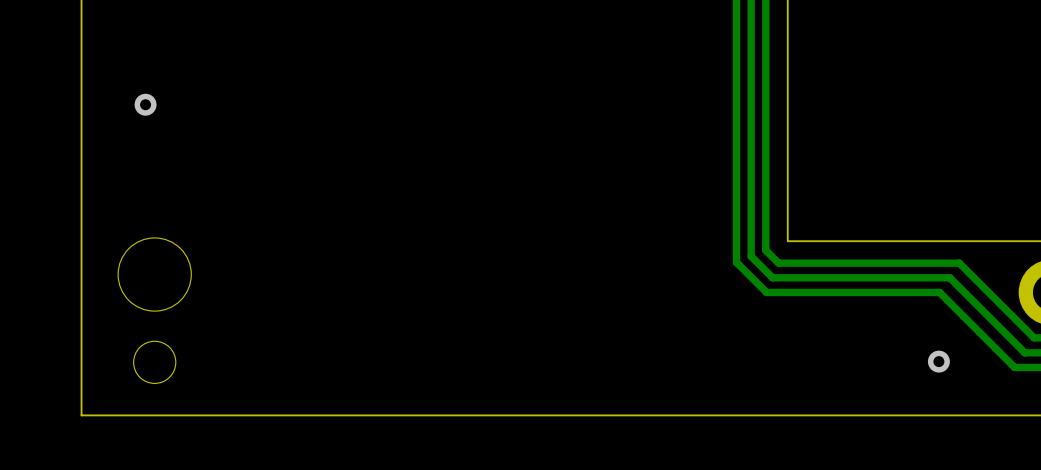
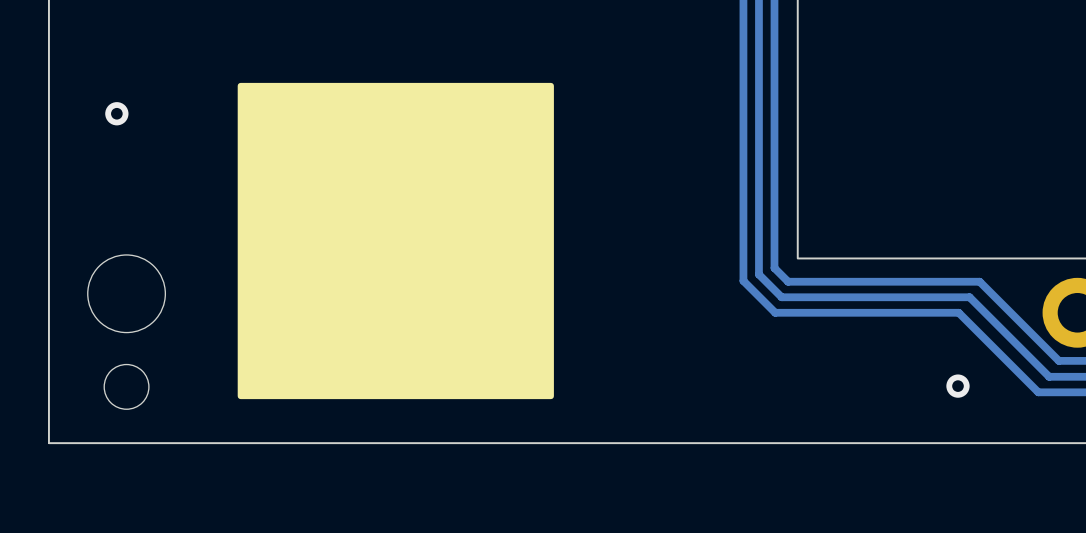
drawing: none -> [237, 82, 554, 400]

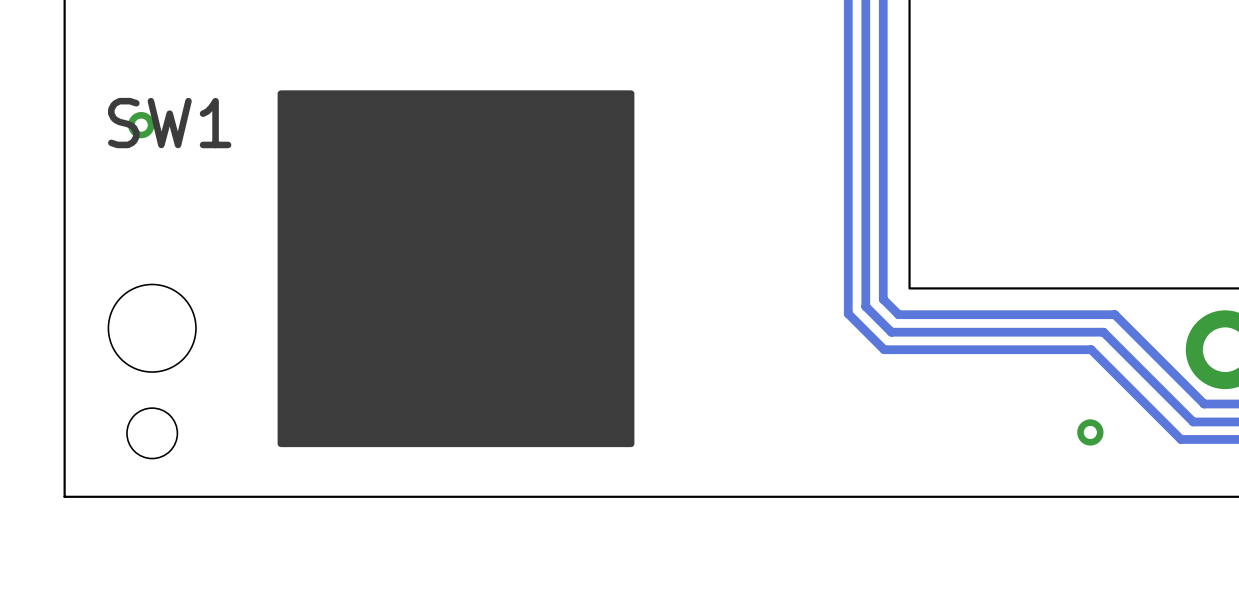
SW1: none -> (169, 123)

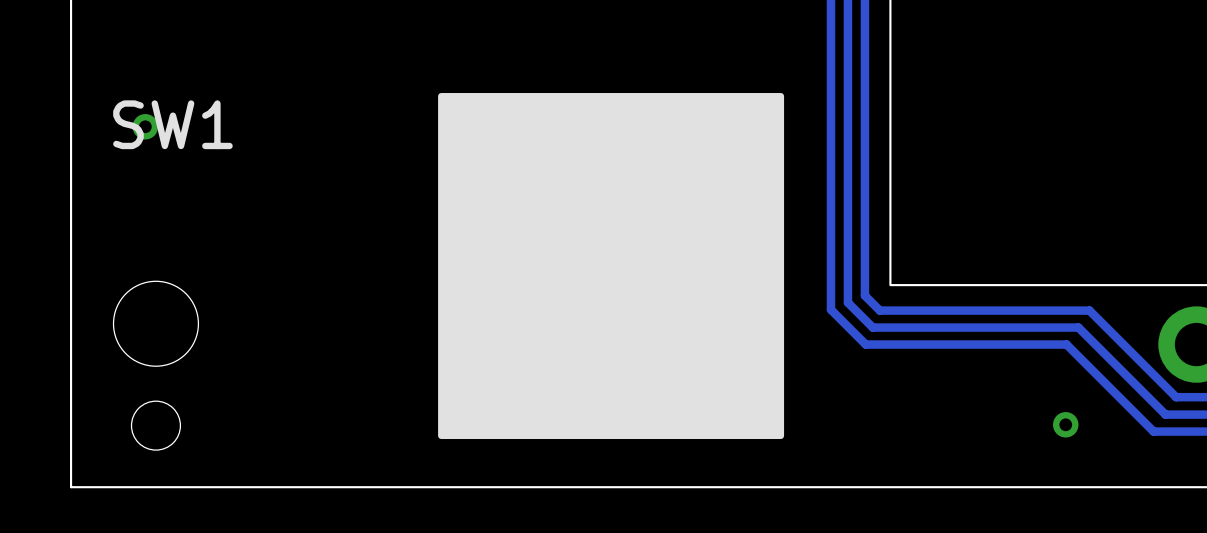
drawing position: (456, 268) -> (611, 266)

